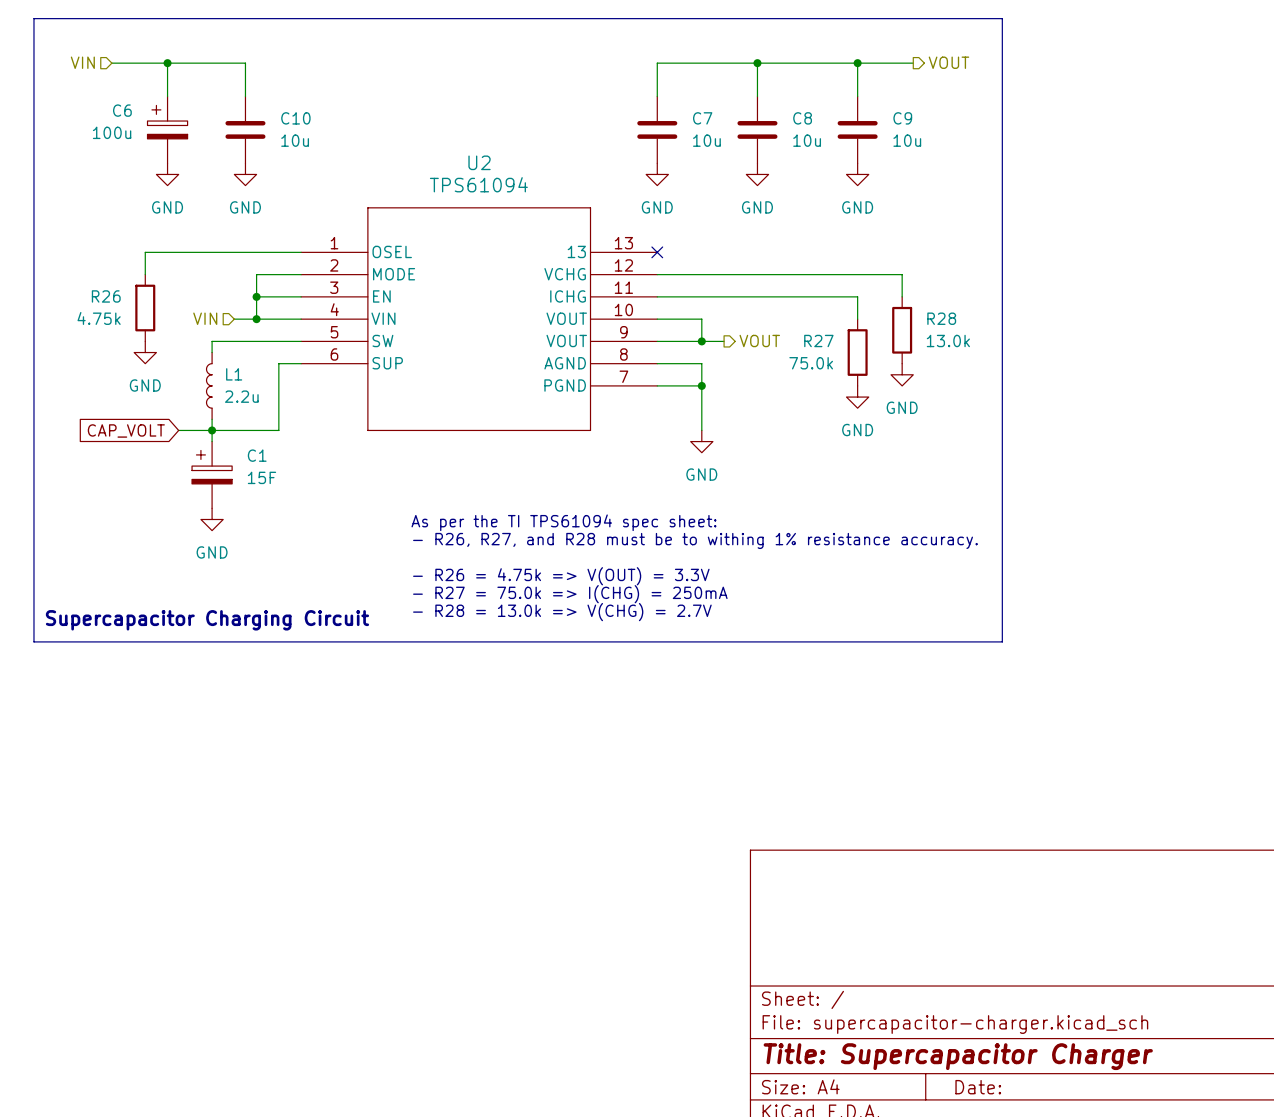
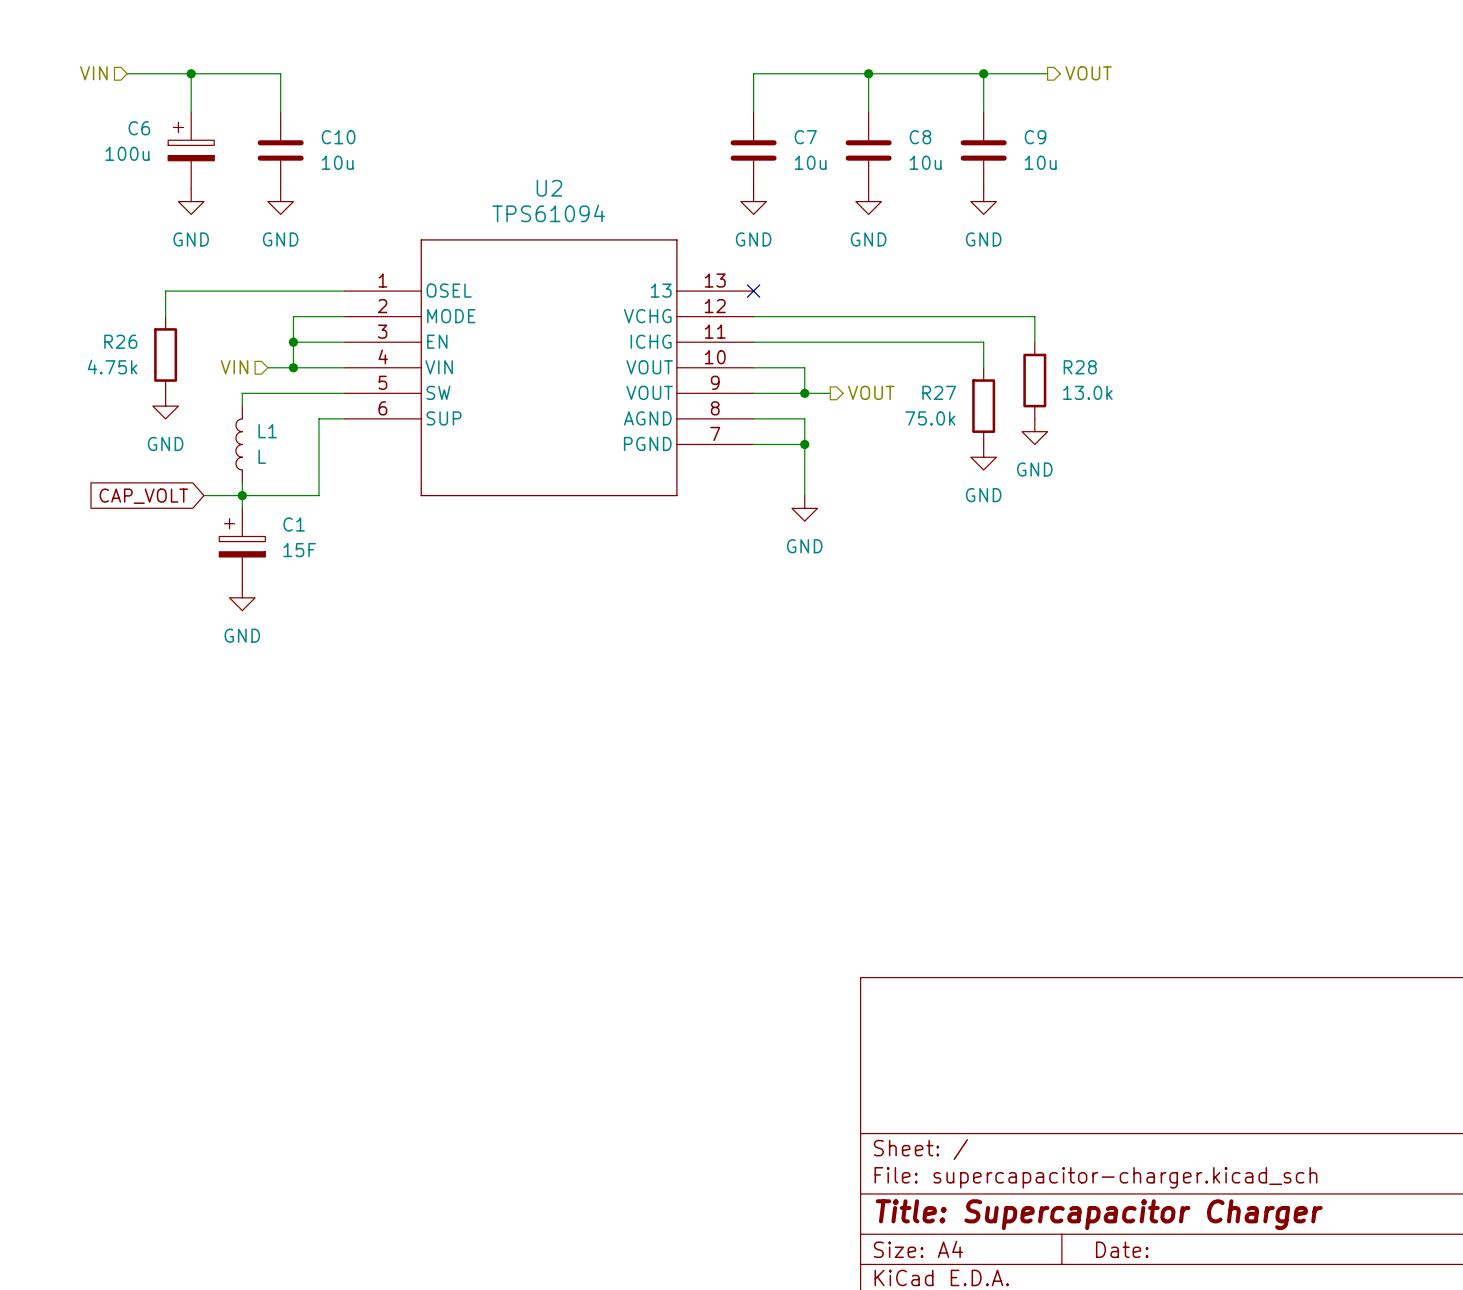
line: (33, 18) (1002, 18) (1002, 641) (33, 641) (33, 18) -> none
L1 value: 2.2u (241, 396) -> L (262, 456)
text: As per the TI TPS61094 spec sheet: (563, 522) -> none
text: - R26, R27, and R28 must be to withing 1% resistance accuracy. (695, 540) -> none
text: - R26 = 4.75k => V(OUT) = 3.3V (561, 576) -> none
text: - R27 = 75.0k => I(CHG) = 250mA (570, 594) -> none
text: - R28 = 13.0k => V(CHG) = 2.7V (562, 612) -> none
text: Supercapacitor Charging Circuit (207, 620) -> none

